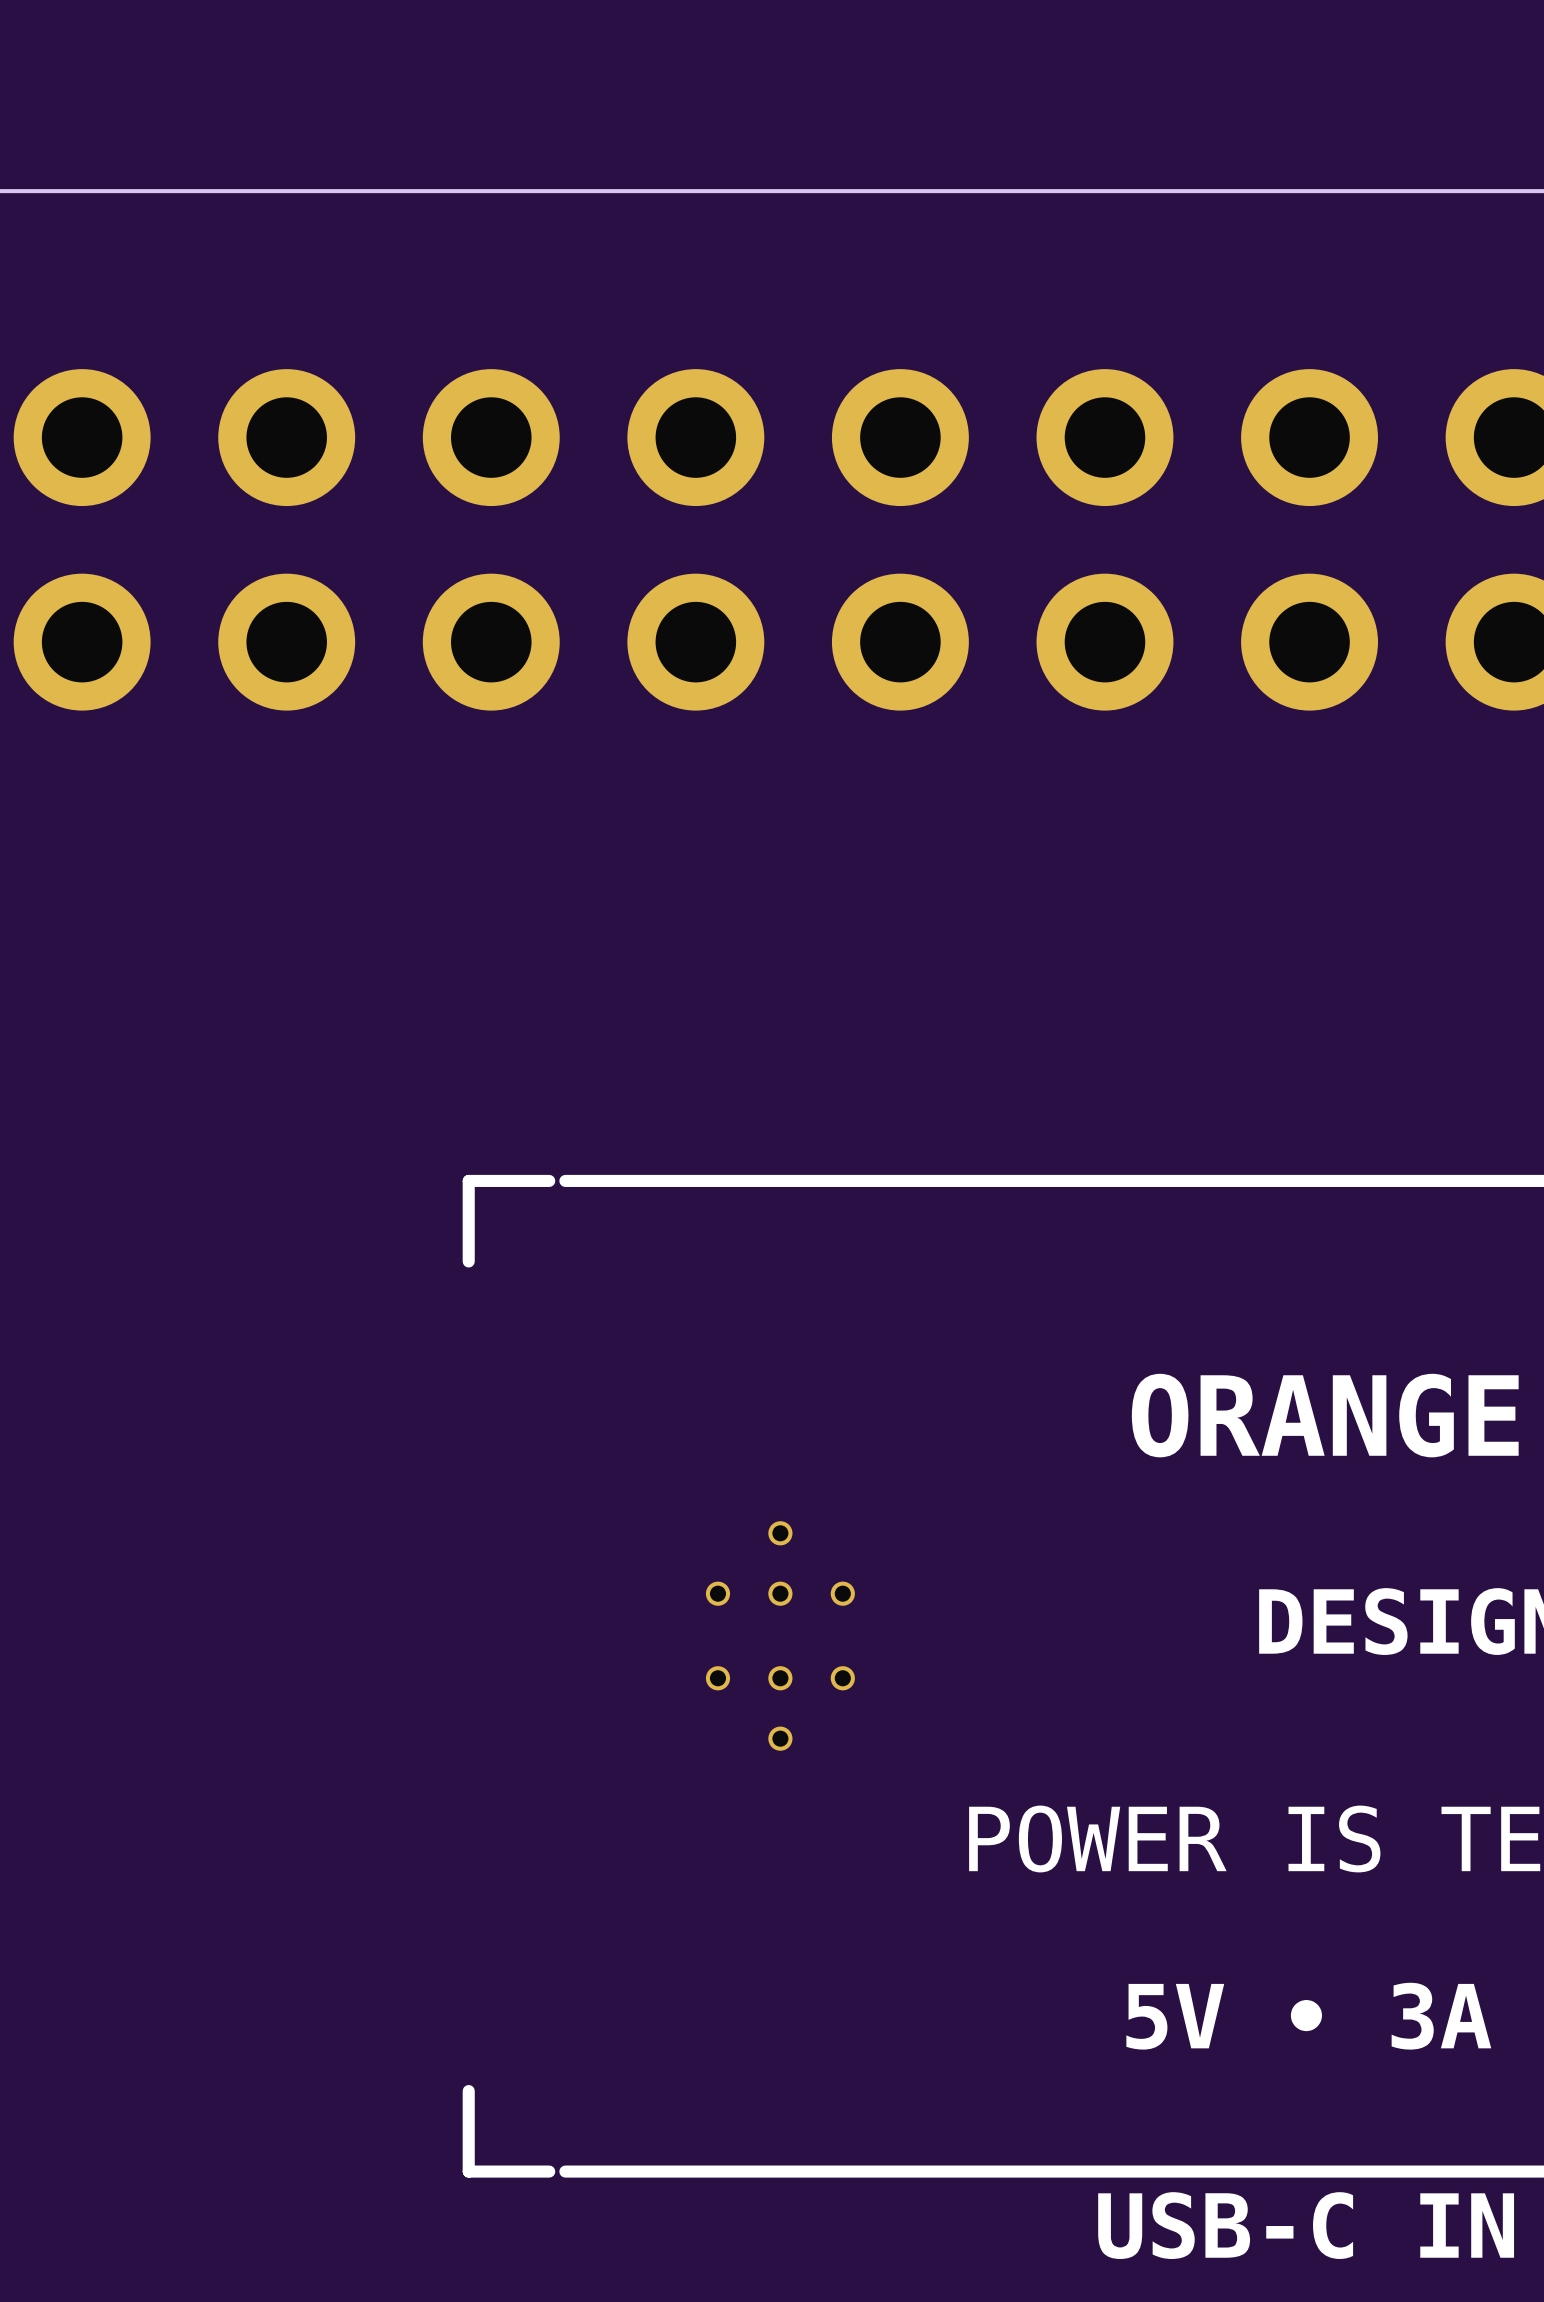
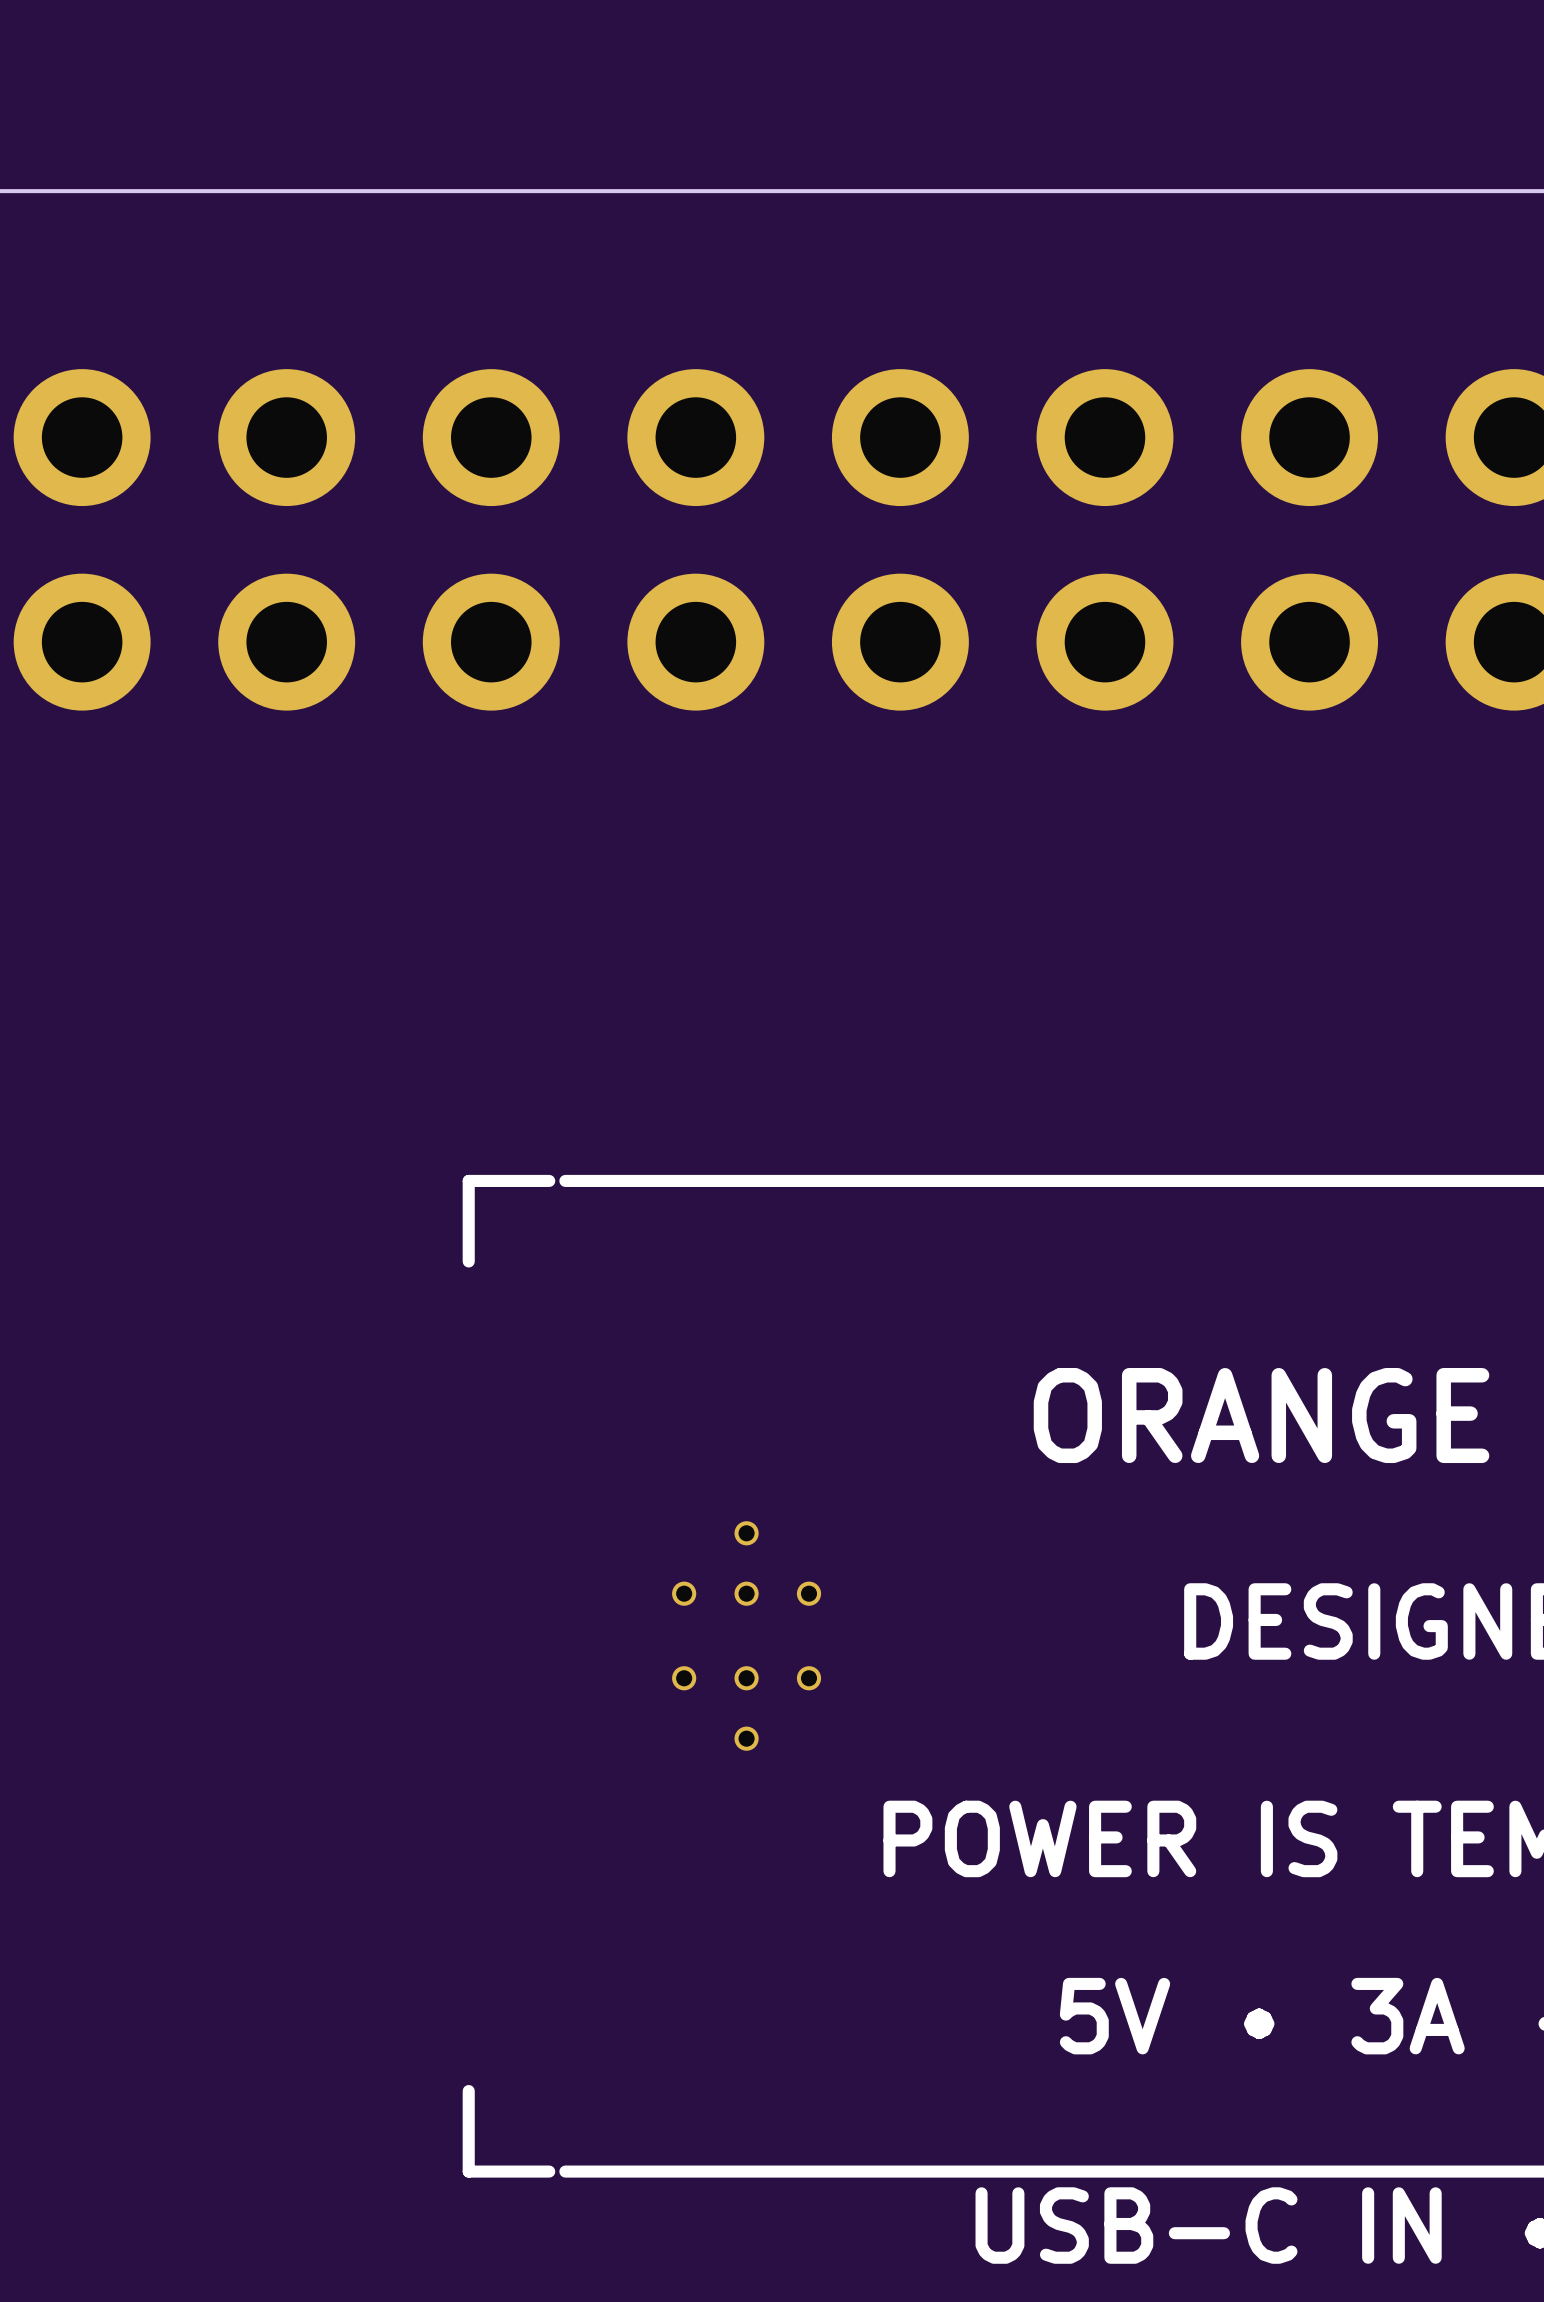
part position: (780, 1635) -> (746, 1635)

